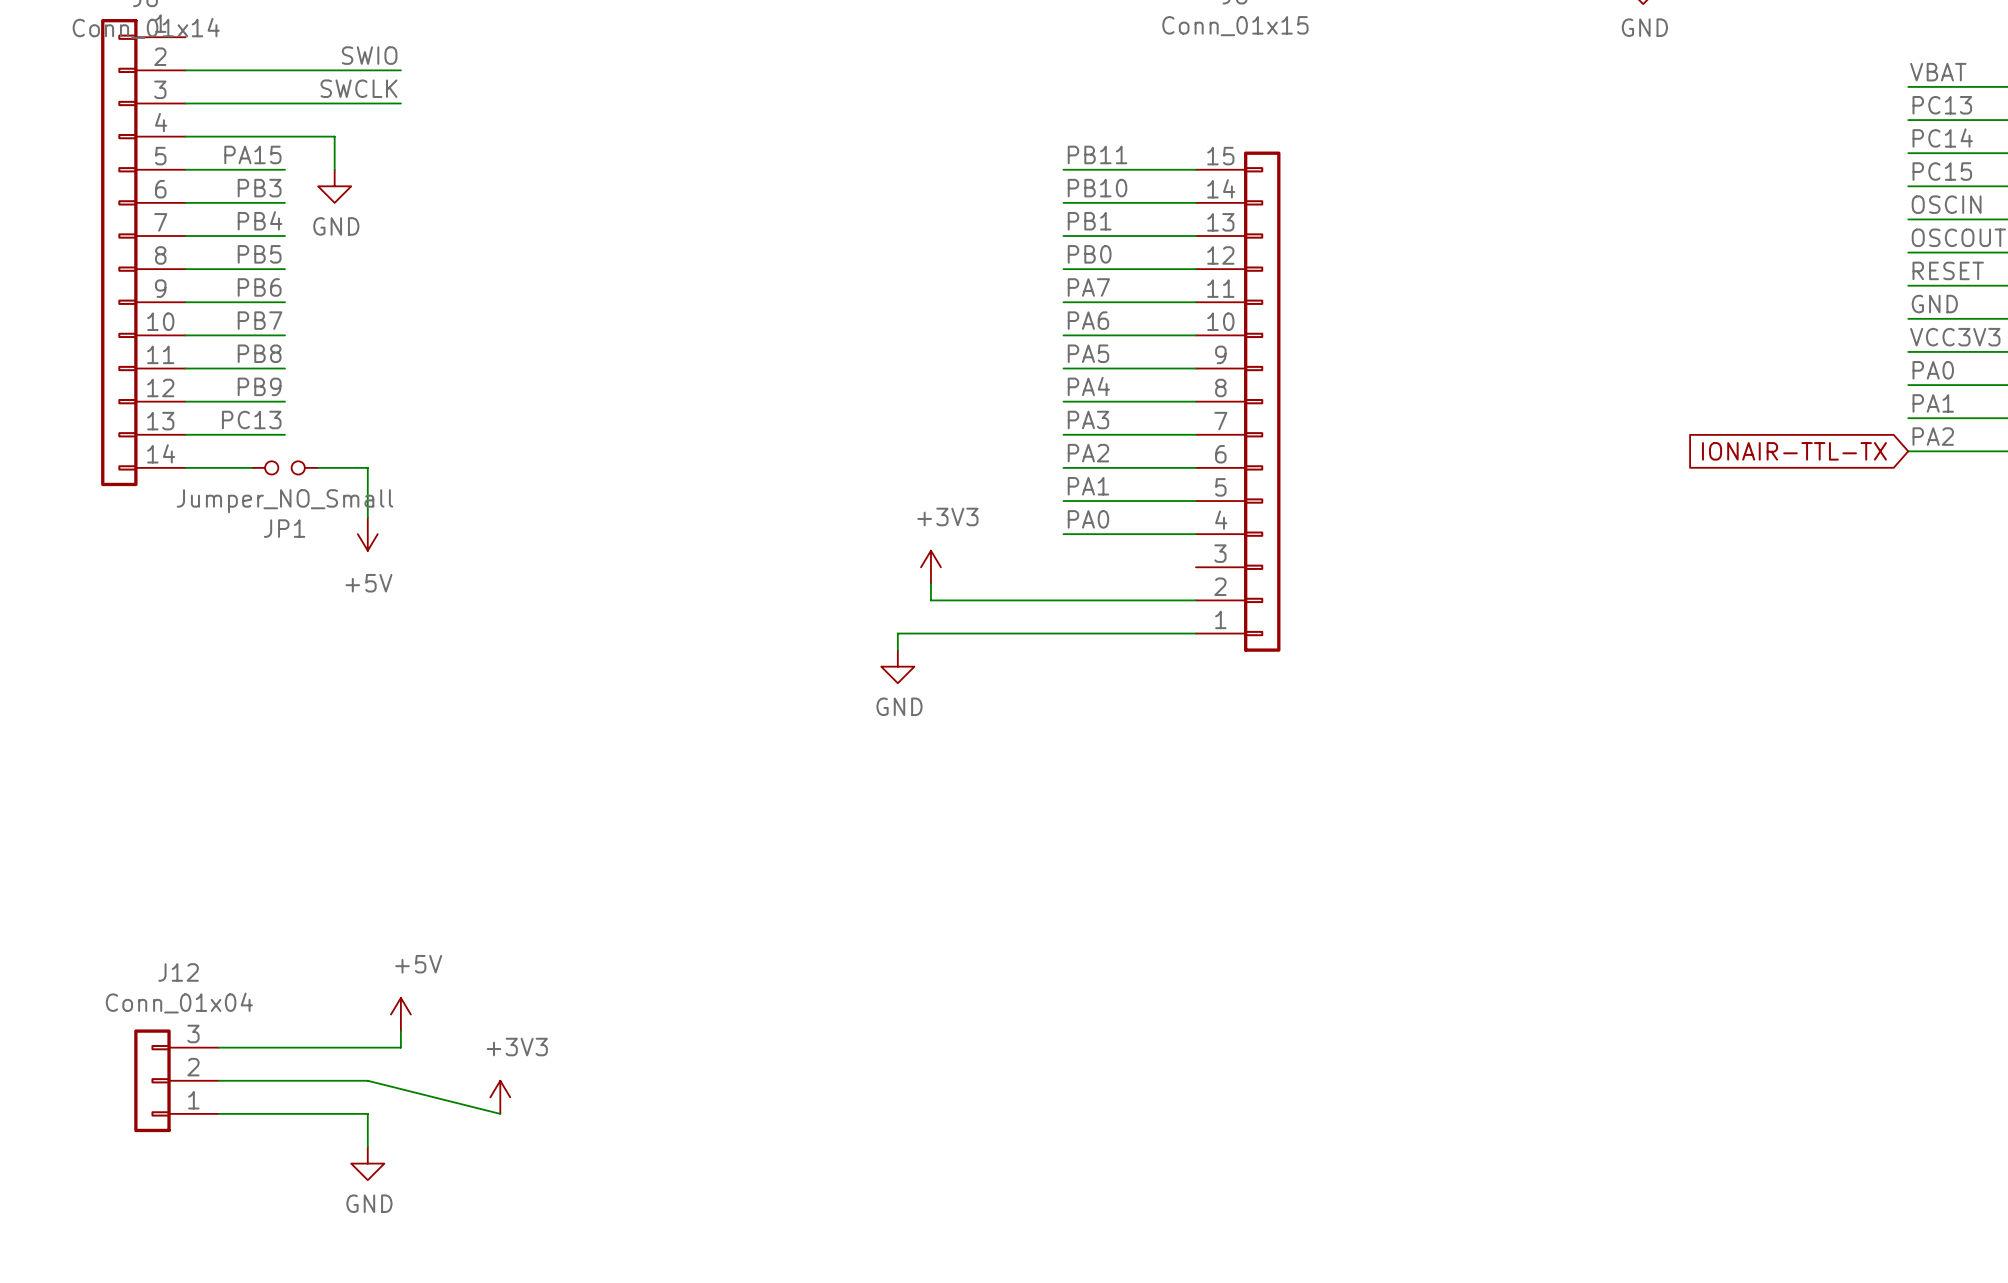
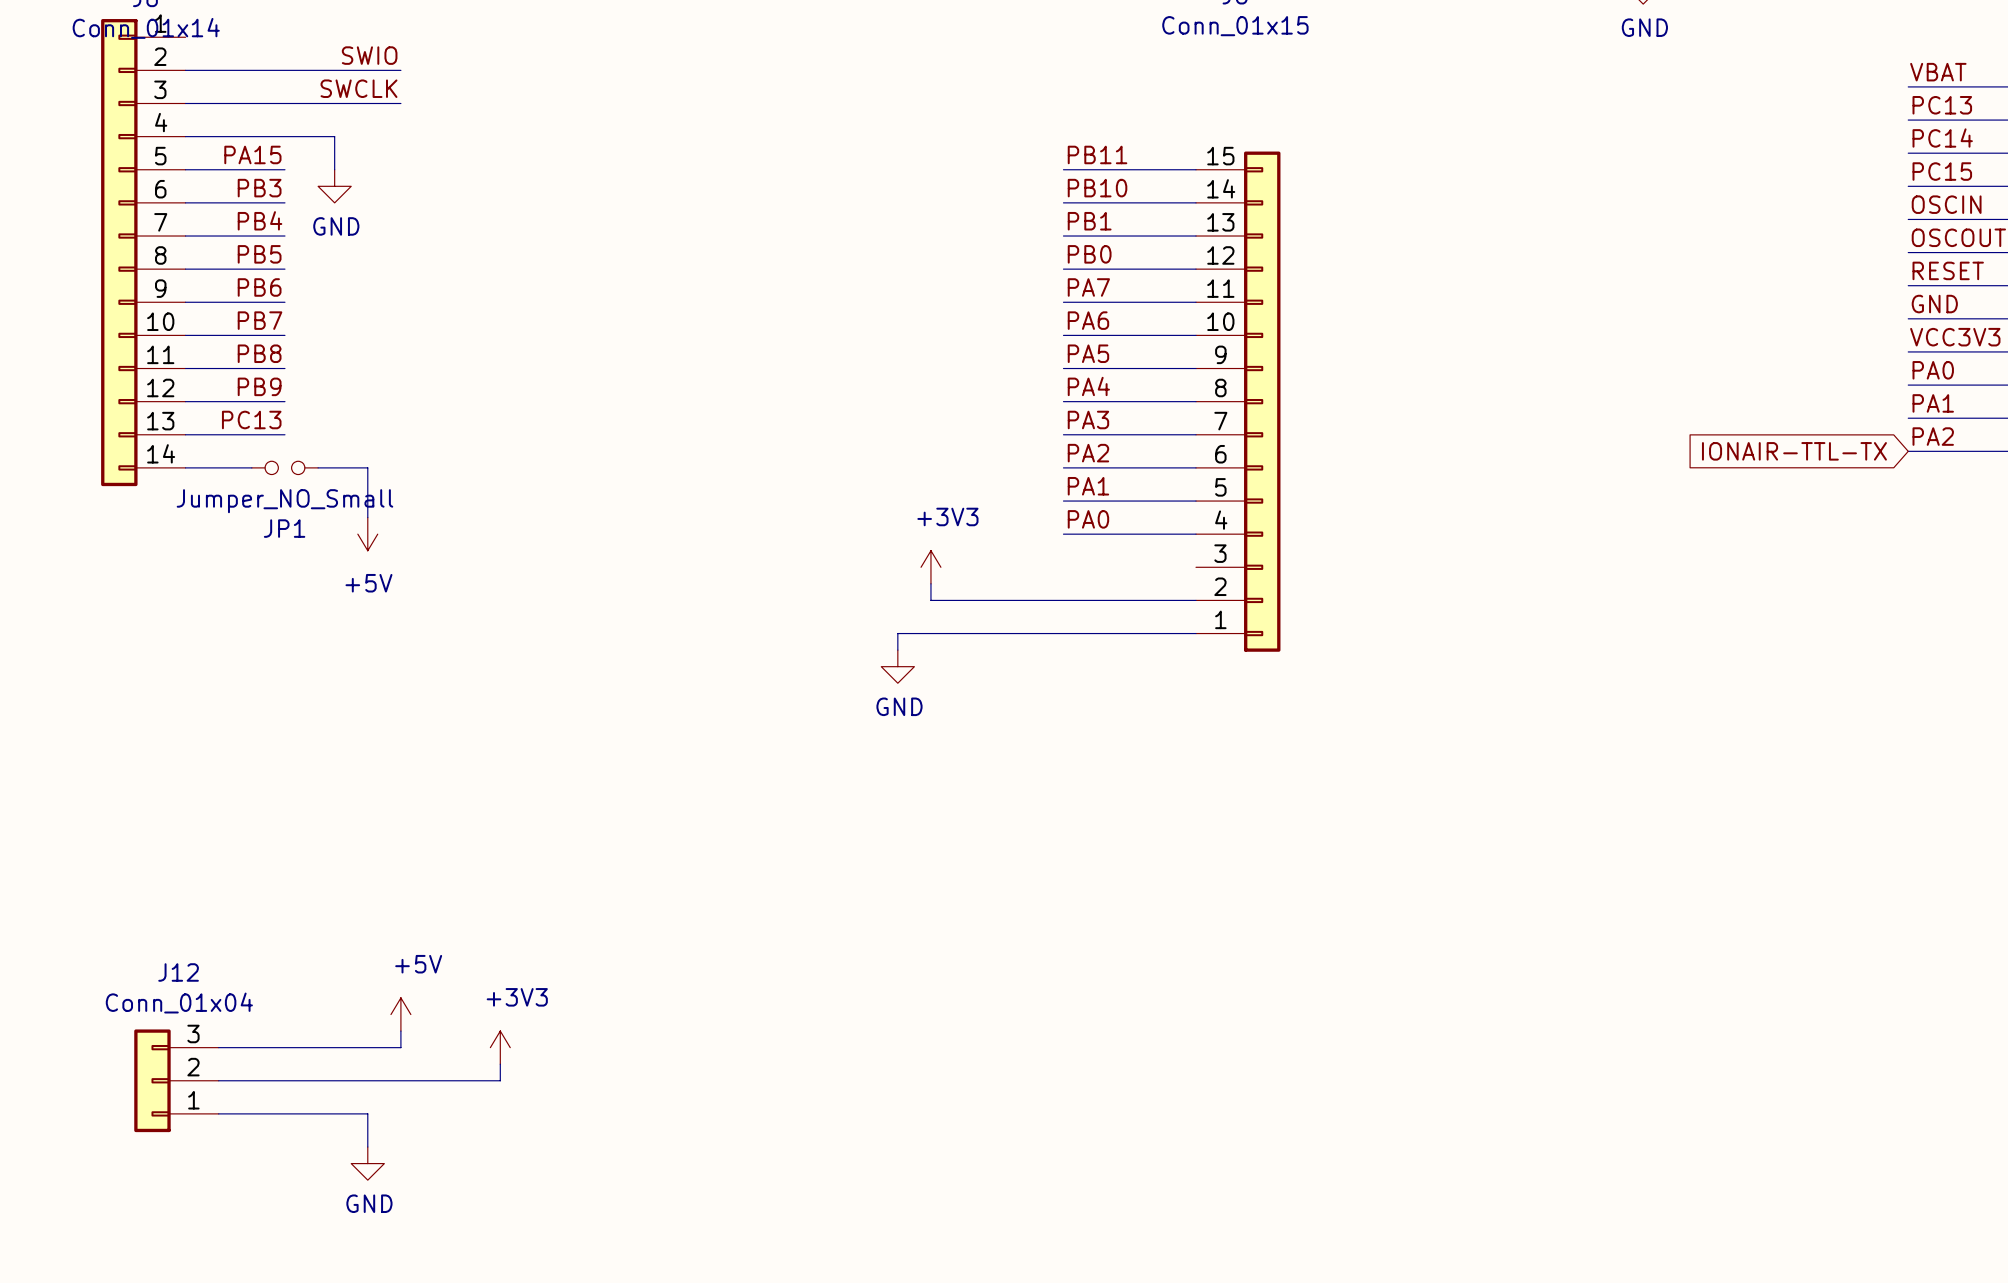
wire: (367, 1080) (500, 1113) -> (367, 1080) (500, 1080) (500, 1064)
power symbol position: +3V3 (500, 1097) -> +3V3 (500, 1047)

